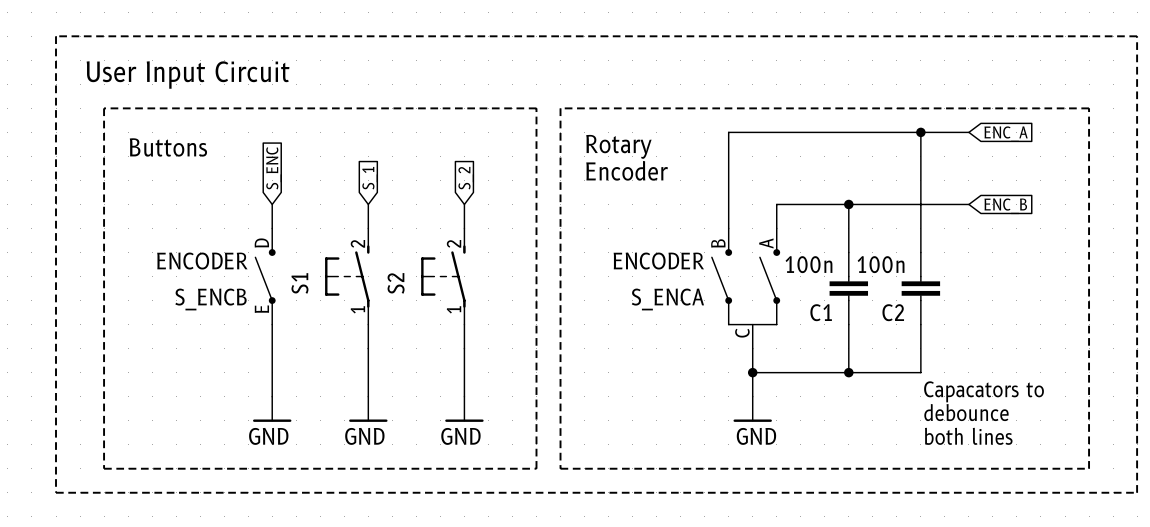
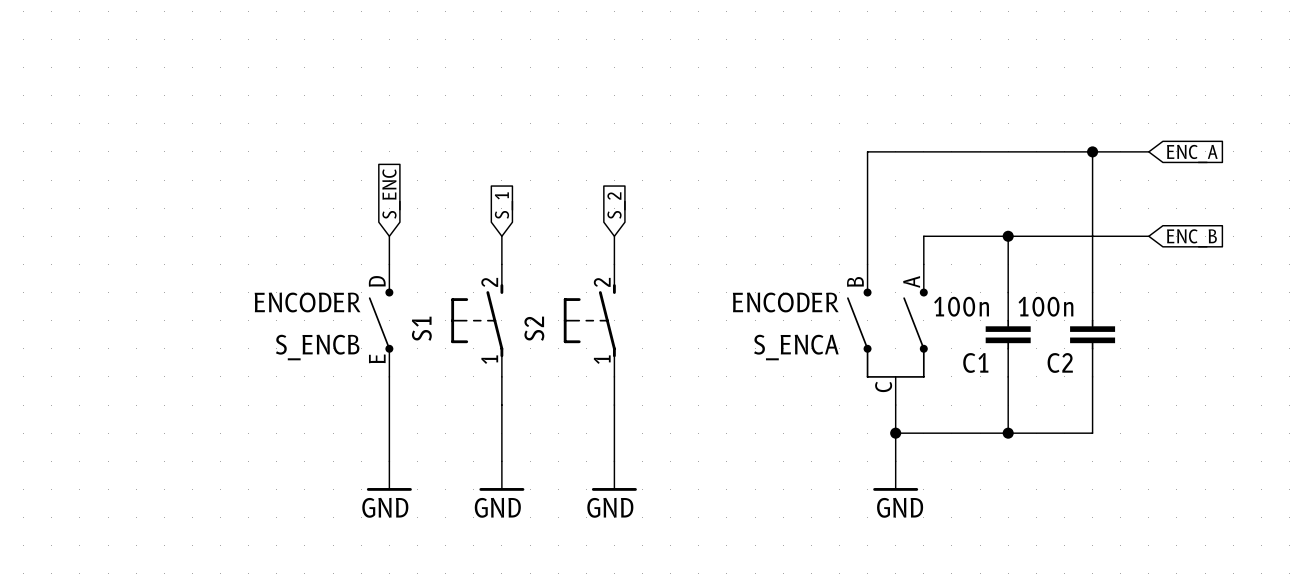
line: (56, 36) (56, 492) (1137, 492) (1137, 36) (56, 36) -> none
text: User Input Circuit (188, 75) -> none
line: (104, 108) (104, 468) (536, 468) (536, 108) (104, 108) -> none
line: (560, 108) (1089, 108) (1089, 468) (560, 468) (560, 108) -> none
wire: (776, 132) (728, 132) (728, 228) -> (867, 151) (867, 236)
wire: (920, 132) (920, 252) -> none
junction: (920, 132) -> none
junction: none -> (1092, 151)
wire: none -> (1148, 151) (1092, 151) (1092, 292)
global label position: ENC_A (1006, 134) -> ENC_A (1192, 153)
text: Rotary (618, 146) -> none
text: Buttons (168, 147) -> none
global label: S_ENC (274, 168) -> none
text: Encoder (627, 170) -> none
global label: S_1 (370, 178) -> S_ENC (391, 193)
global label: S_2 (466, 178) -> S_1 (503, 205)
global label: none -> S_2 (616, 205)
wire: (272, 204) (272, 228) -> none
wire: (776, 204) (824, 204) -> (923, 264) (923, 236)
wire: (848, 204) (848, 252) -> (1008, 236) (1008, 292)
junction: (848, 204) -> none
junction: none -> (1008, 236)
wire: none -> (1092, 236) (1148, 236)
global label position: ENC_B (1005, 206) -> ENC_B (1191, 238)
S_ENCB position: (265, 276) -> (381, 320)
S1: (347, 276) -> none
S2: none -> (589, 320)
S2 name: S2 (396, 283) -> S1 (421, 328)
S_ENCA position: (745, 288) -> (887, 334)
C1 position: (848, 288) -> (1008, 334)
C2 position: (920, 288) -> (1092, 334)
wire: (272, 324) (272, 396) -> none
wire: (848, 324) (848, 372) -> (1008, 376) (1008, 433)
wire: (920, 324) (920, 372) -> (1092, 376) (1092, 433) (1036, 433)
wire: (752, 348) (752, 396) -> (895, 405) (895, 461)
wire: (752, 372) (800, 372) -> none
junction: (752, 372) -> none
junction: none -> (895, 433)
junction: (848, 372) -> none
junction: none -> (1008, 433)
text: Capacators to (984, 391) -> none
power symbol: GND (272, 409) -> none
power symbol: none -> GND (614, 476)
power symbol position: GND (752, 409) -> GND (895, 476)
text: debounce (966, 412) -> none
text: both lines (968, 436) -> none

